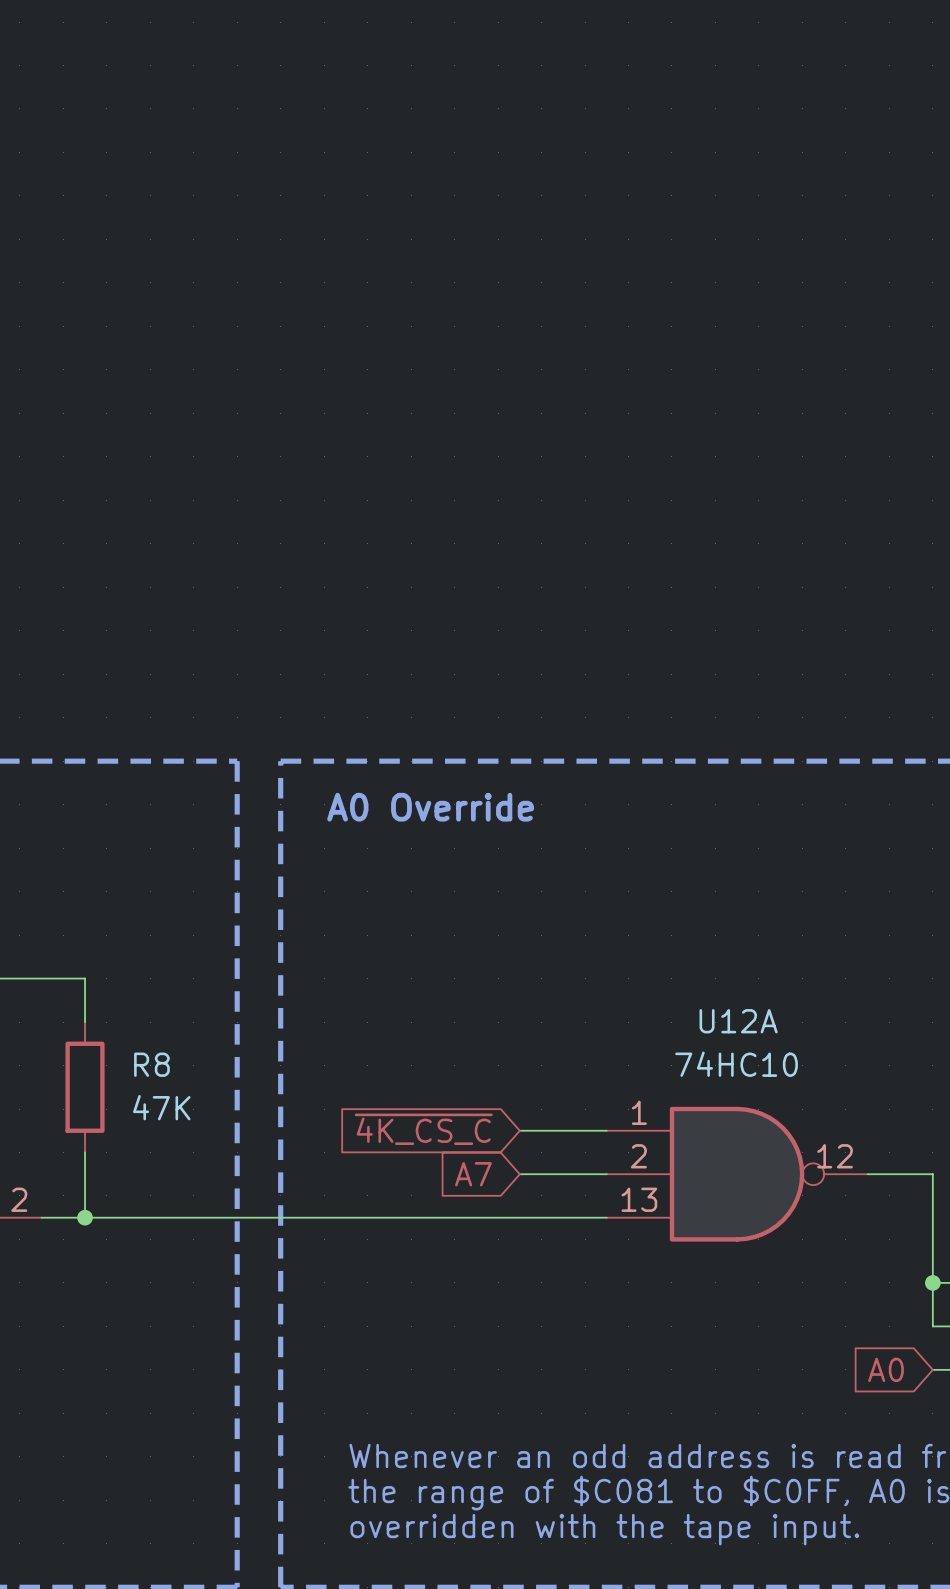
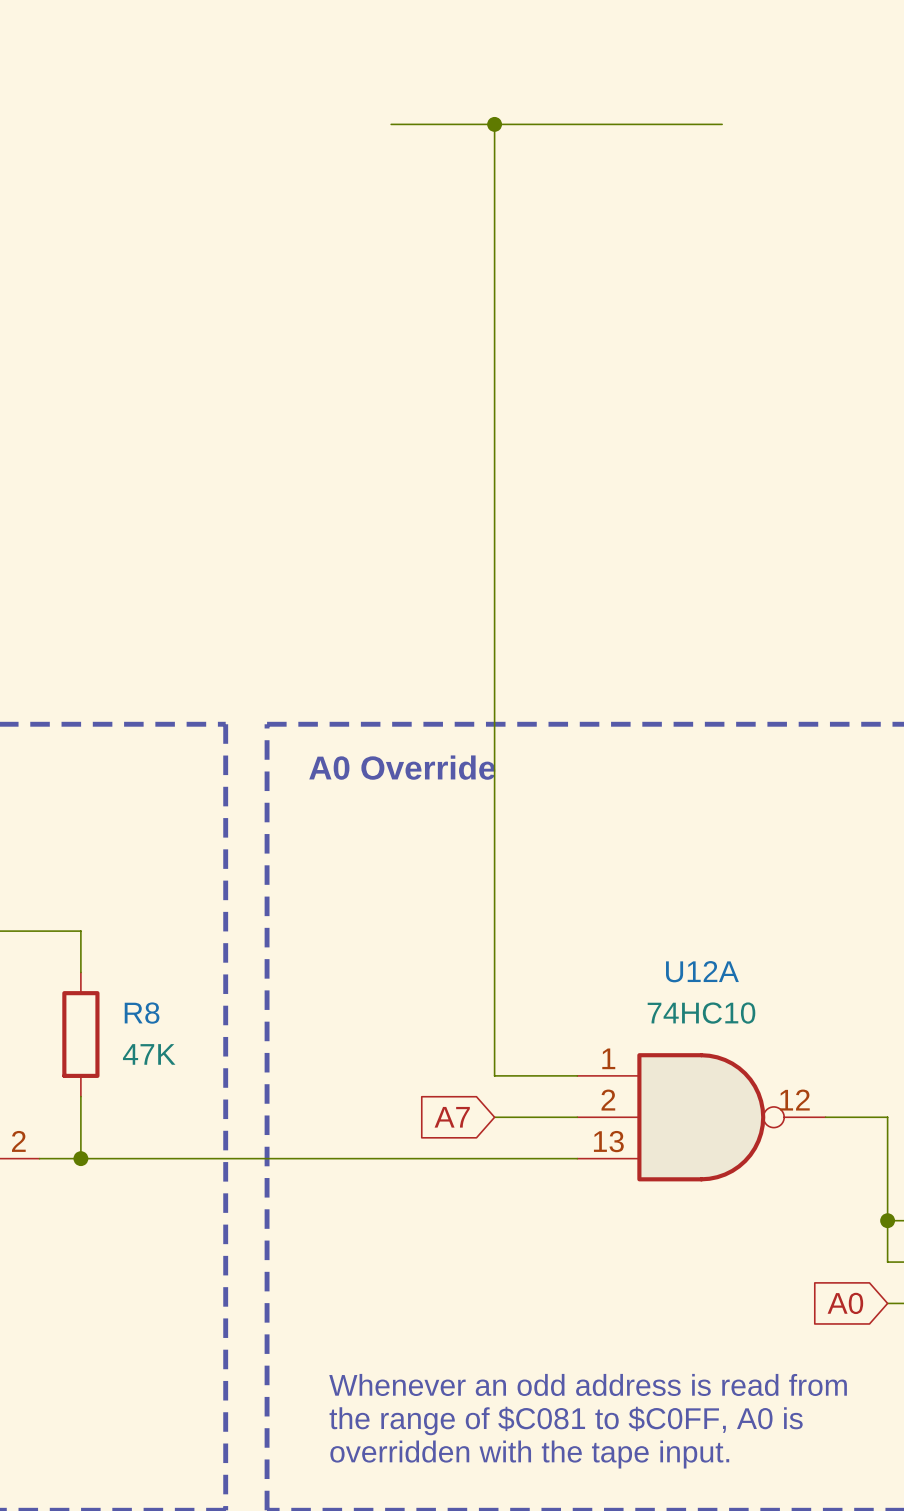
wire: none -> (391, 124) (722, 124)
wire: none -> (494, 124) (494, 1075)
junction: none -> (494, 124)
global label: ~{4K_CS_C} (423, 1129) -> none

